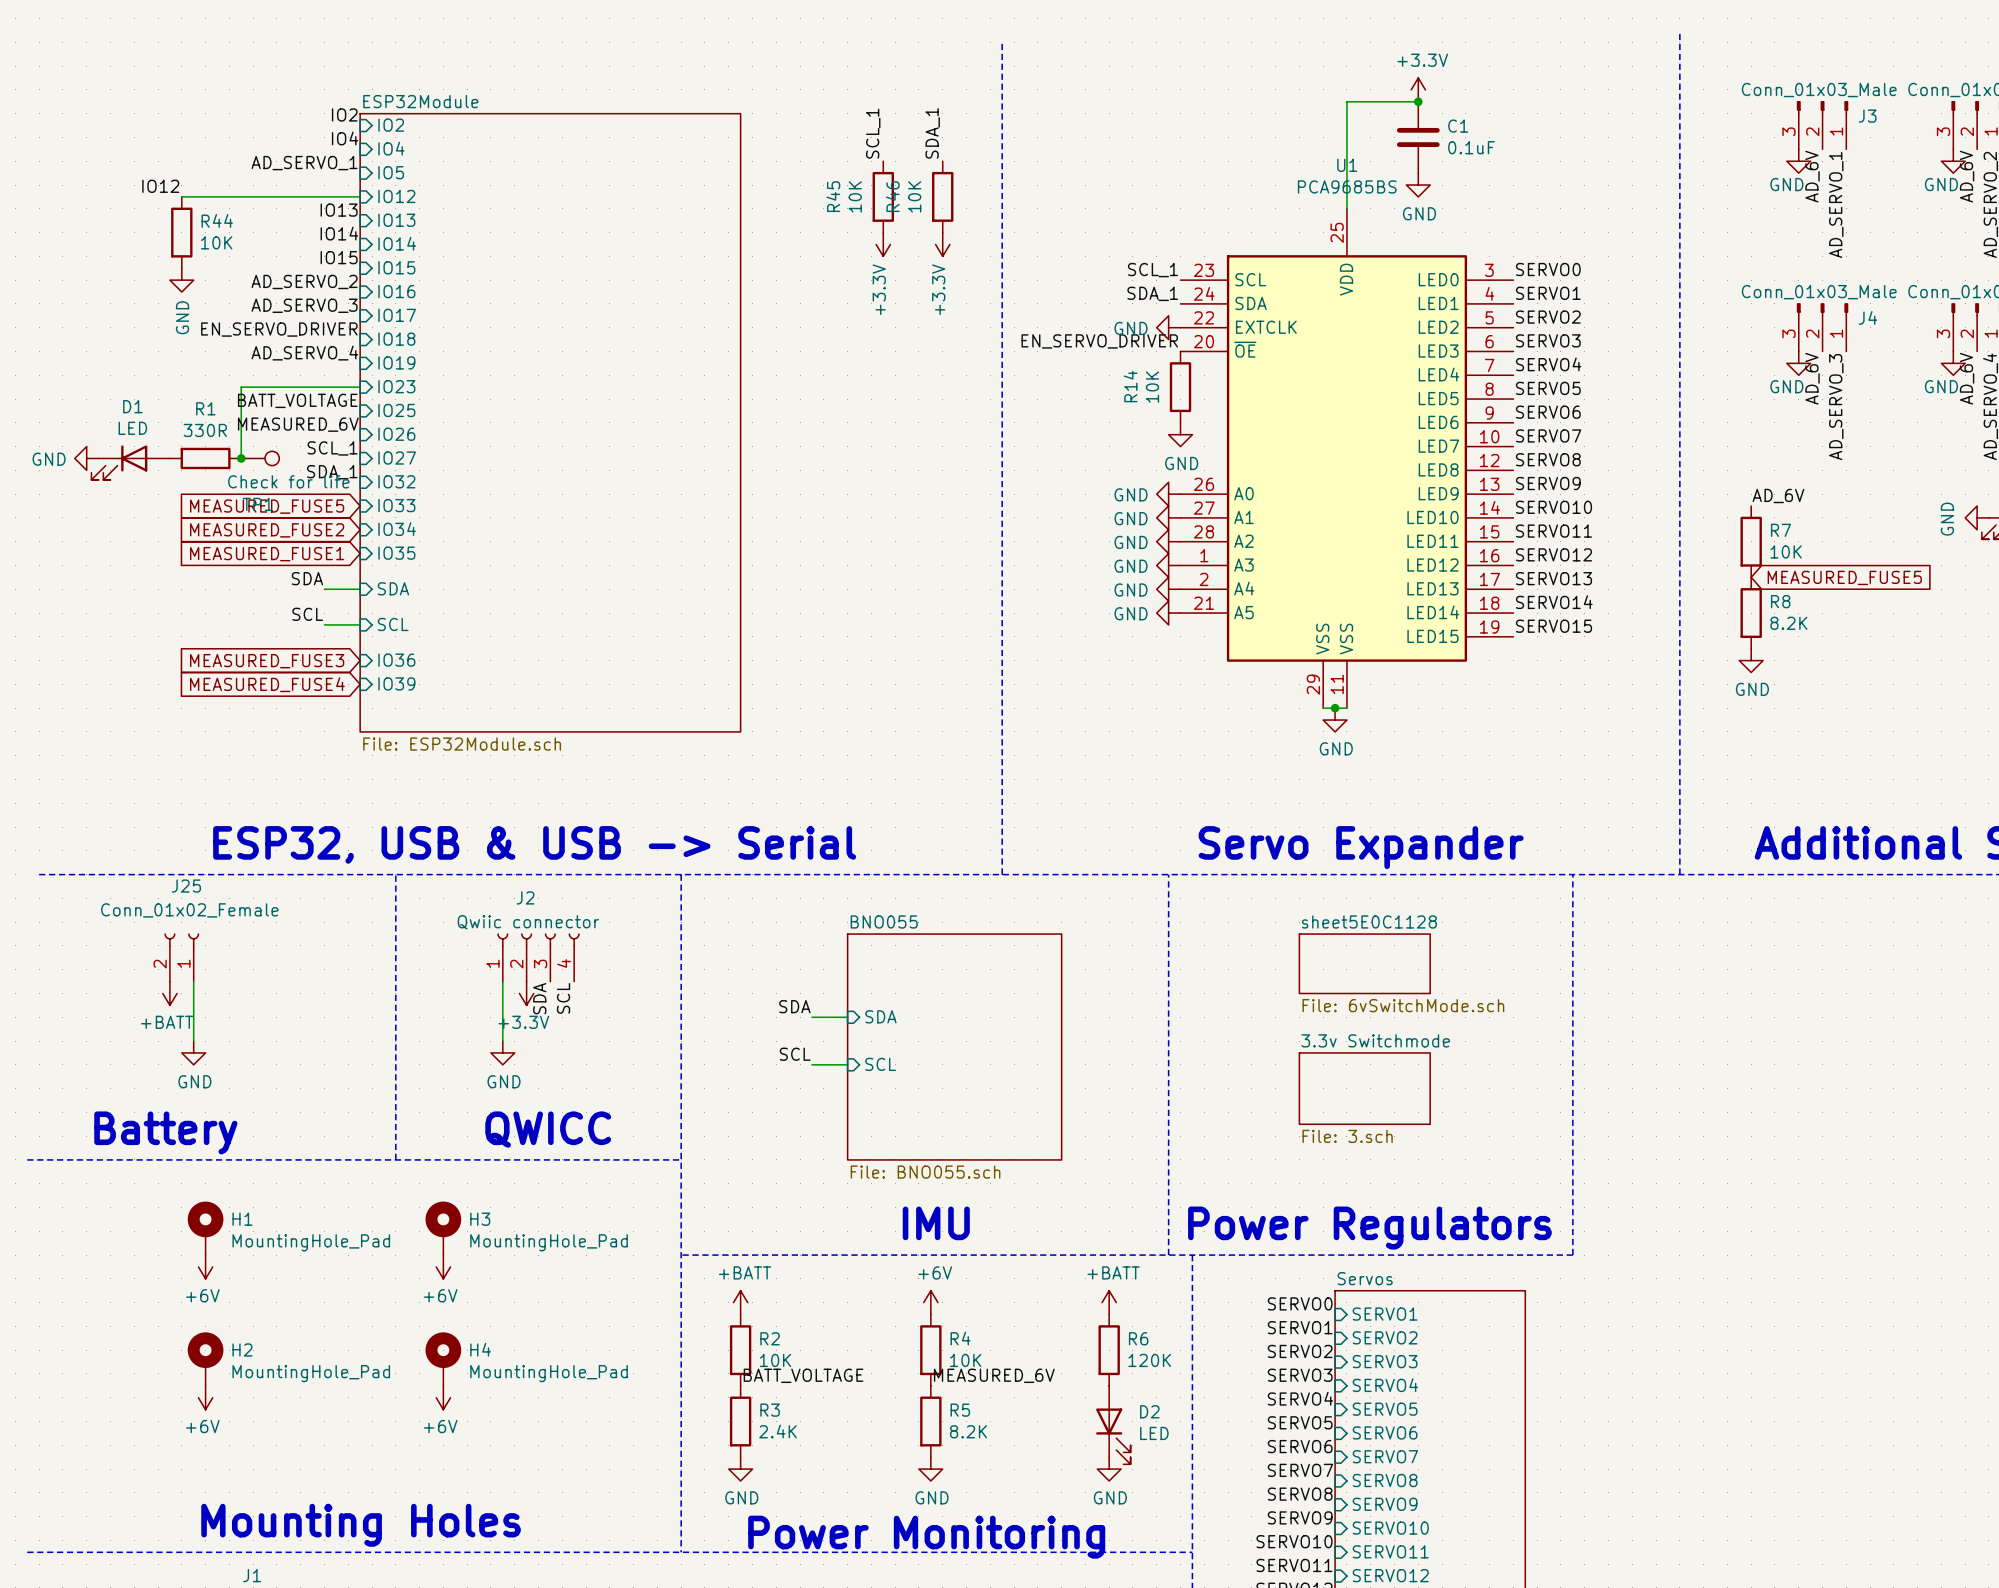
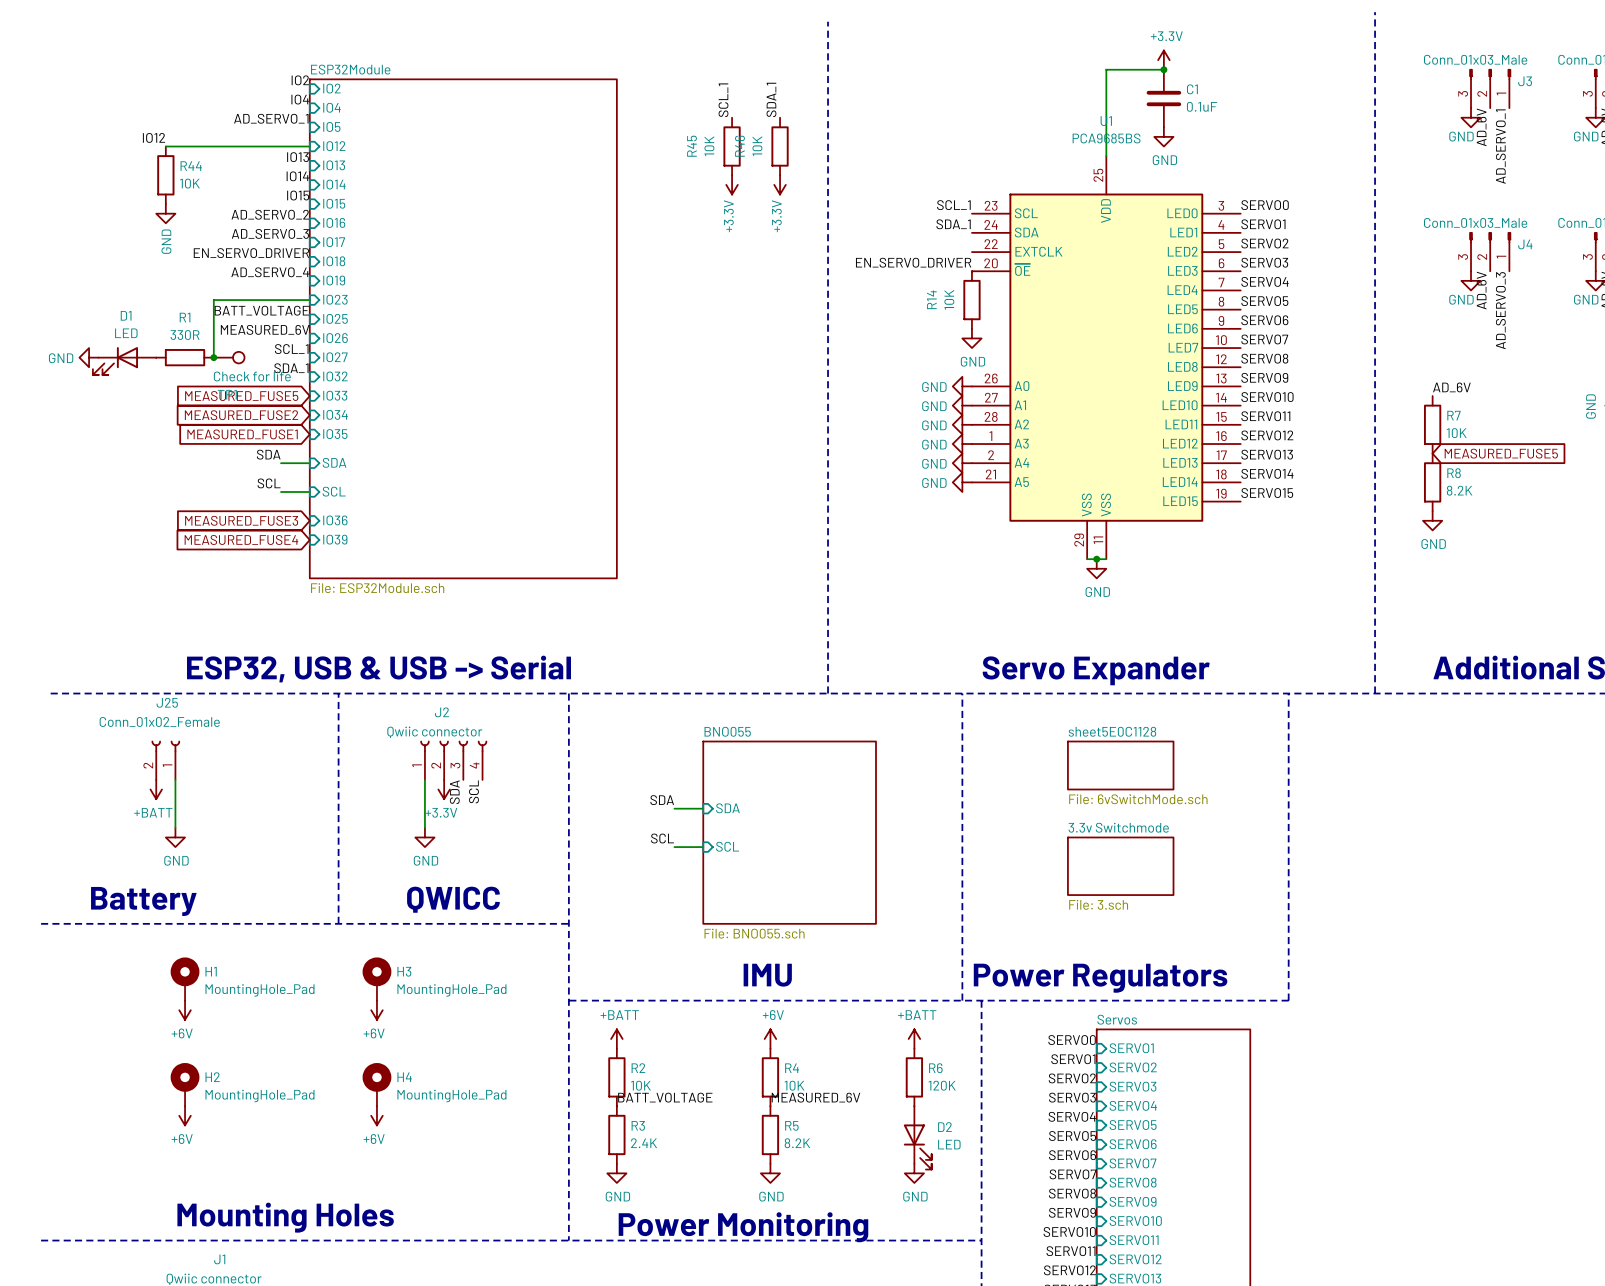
power symbol: GND (1168, 327) -> none

